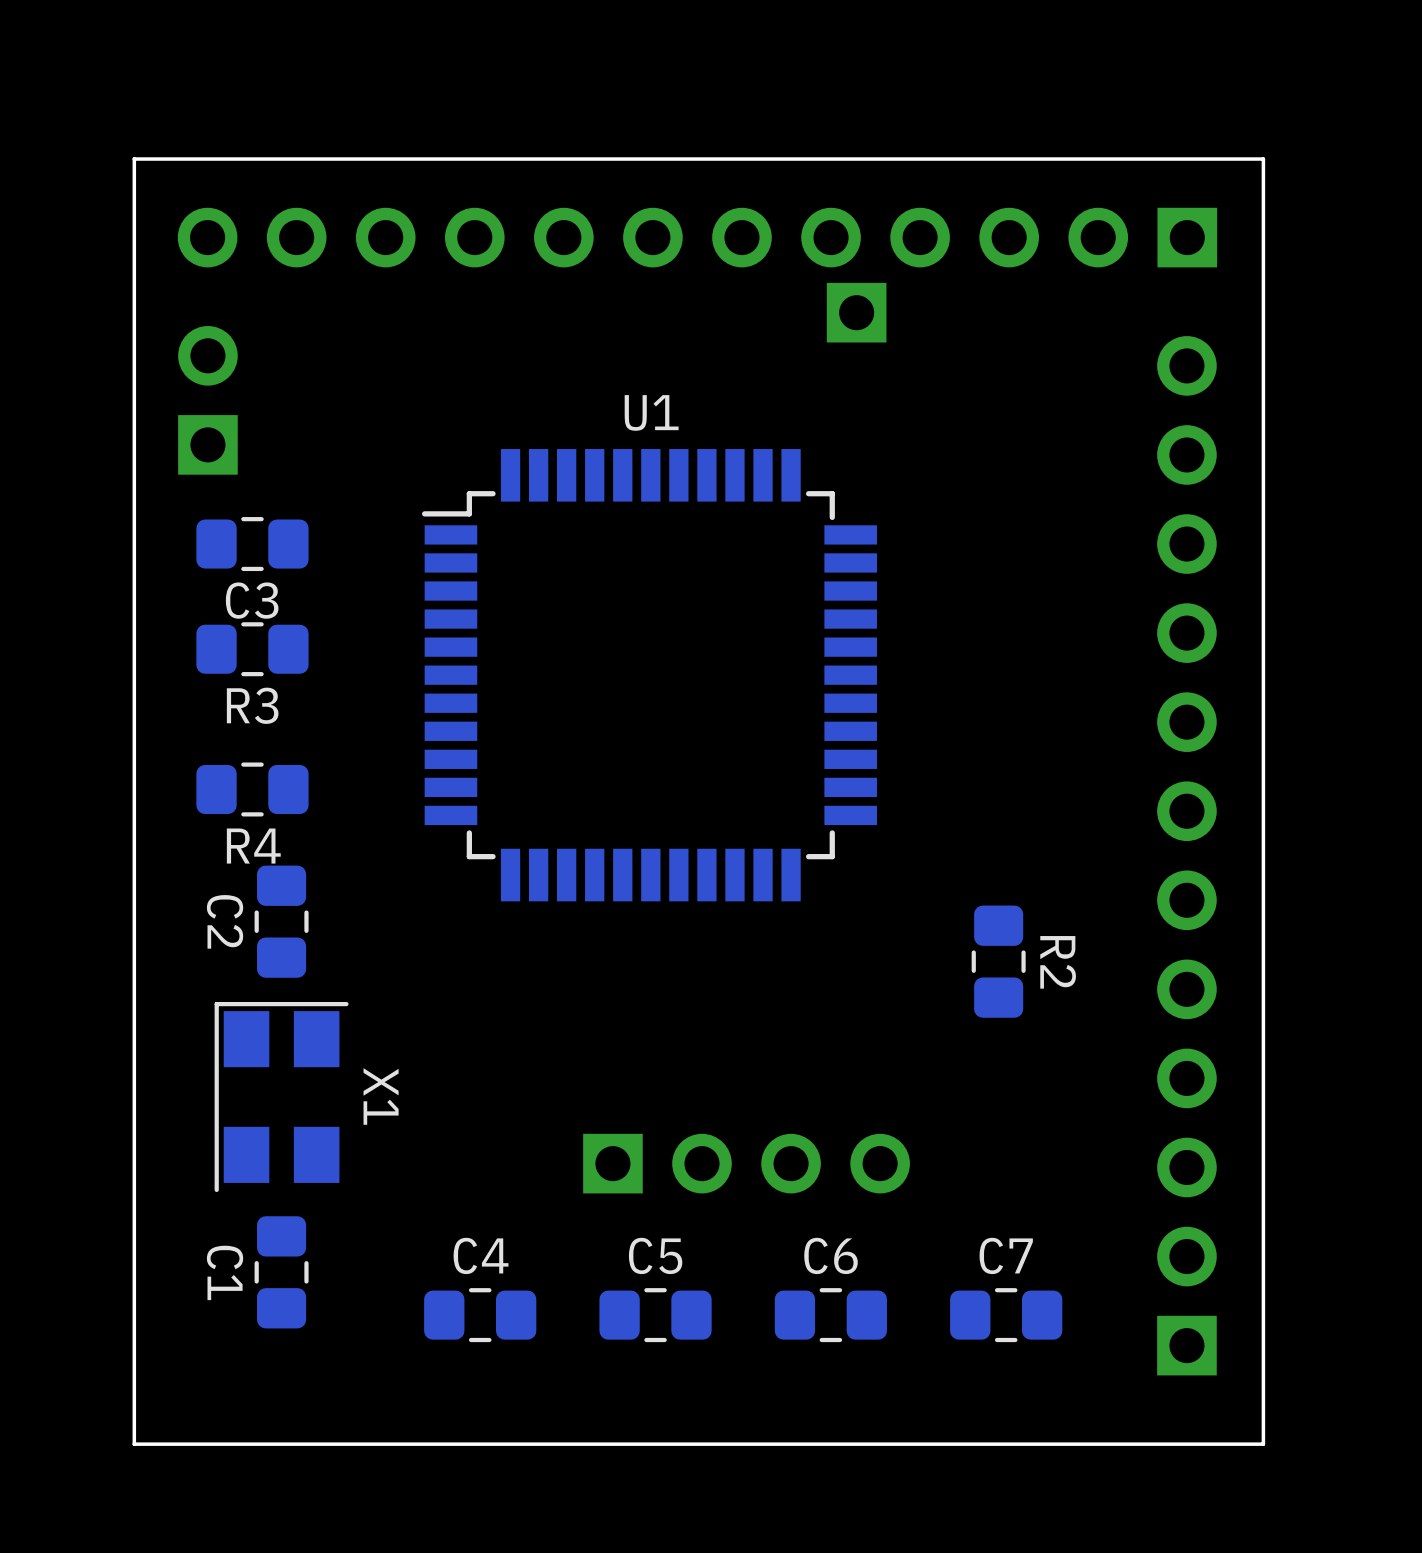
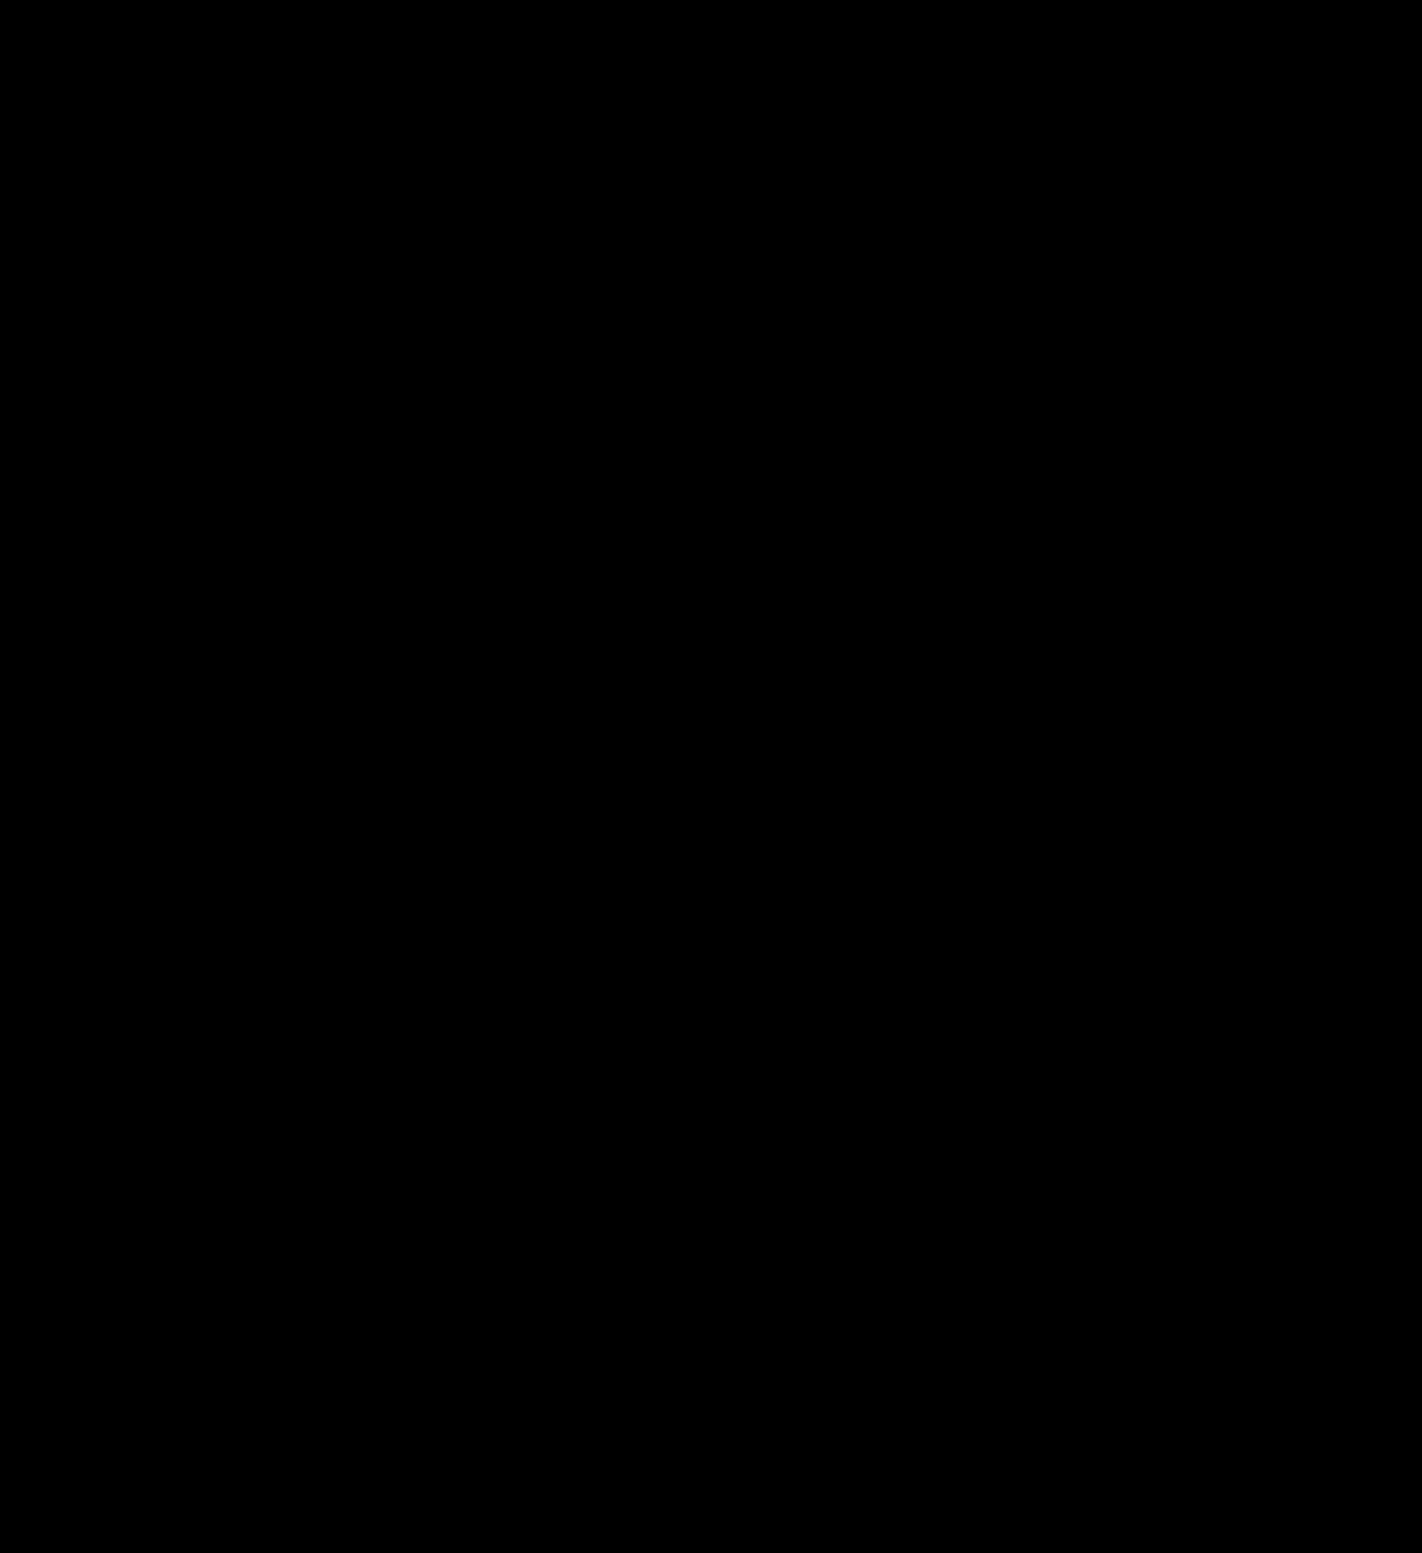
board edge: (1263, 159) (134, 159) (134, 1444) (1263, 1444) (1263, 159) -> none
part: (697, 237) -> none
part: (856, 312) -> none
part: (207, 400) -> none
C3: (252, 544) -> none
R3: (252, 649) -> none
U1: (649, 675) -> none
R4: (252, 789) -> none
part: (1186, 855) -> none
C2: (281, 921) -> none
R2: (998, 961) -> none
X1: (281, 1097) -> none
part: (746, 1163) -> none
C1: (281, 1272) -> none
C4: (480, 1315) -> none
C5: (655, 1315) -> none
C6: (830, 1315) -> none
C7: (1006, 1315) -> none

